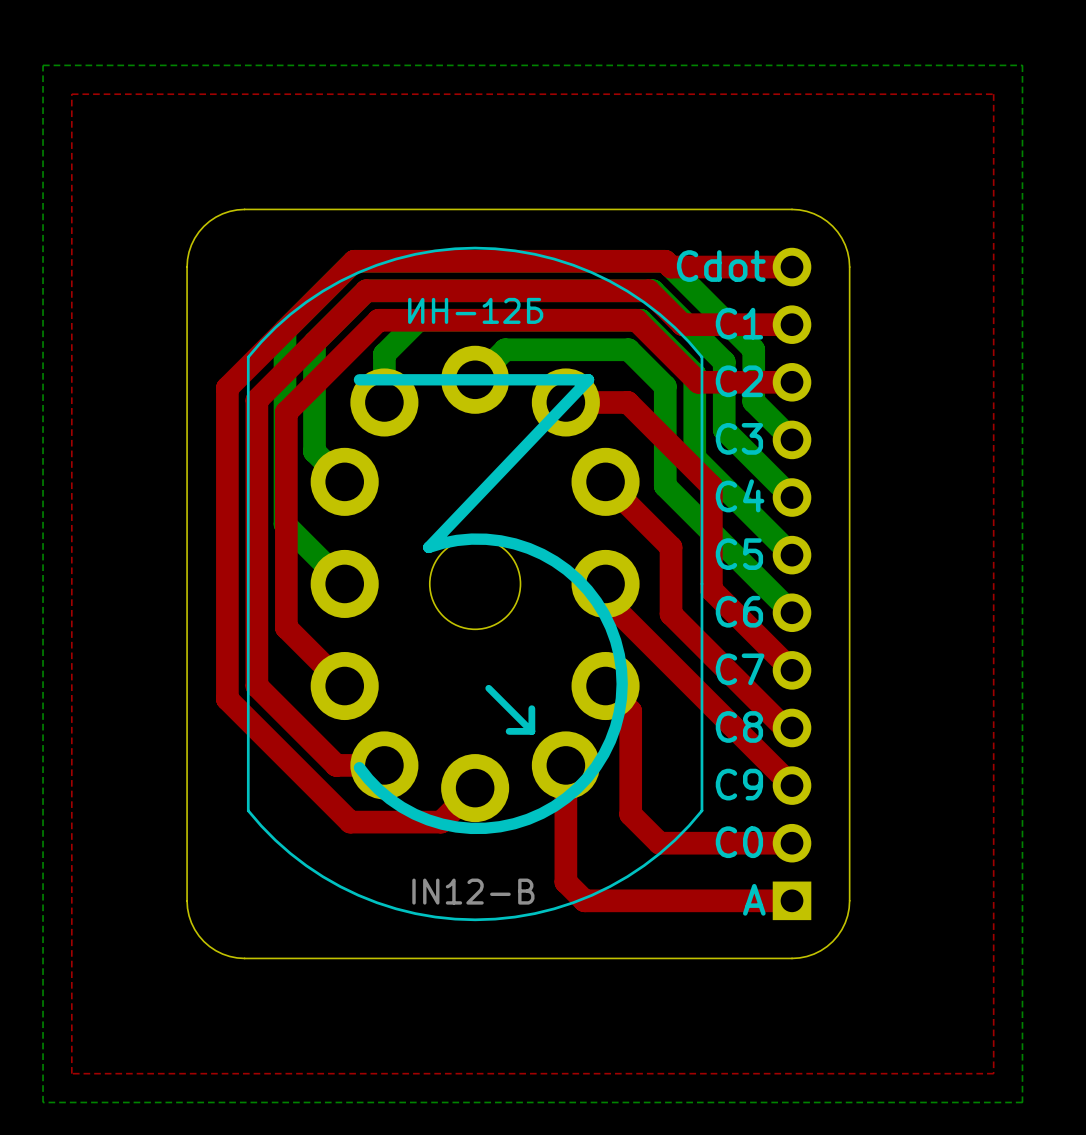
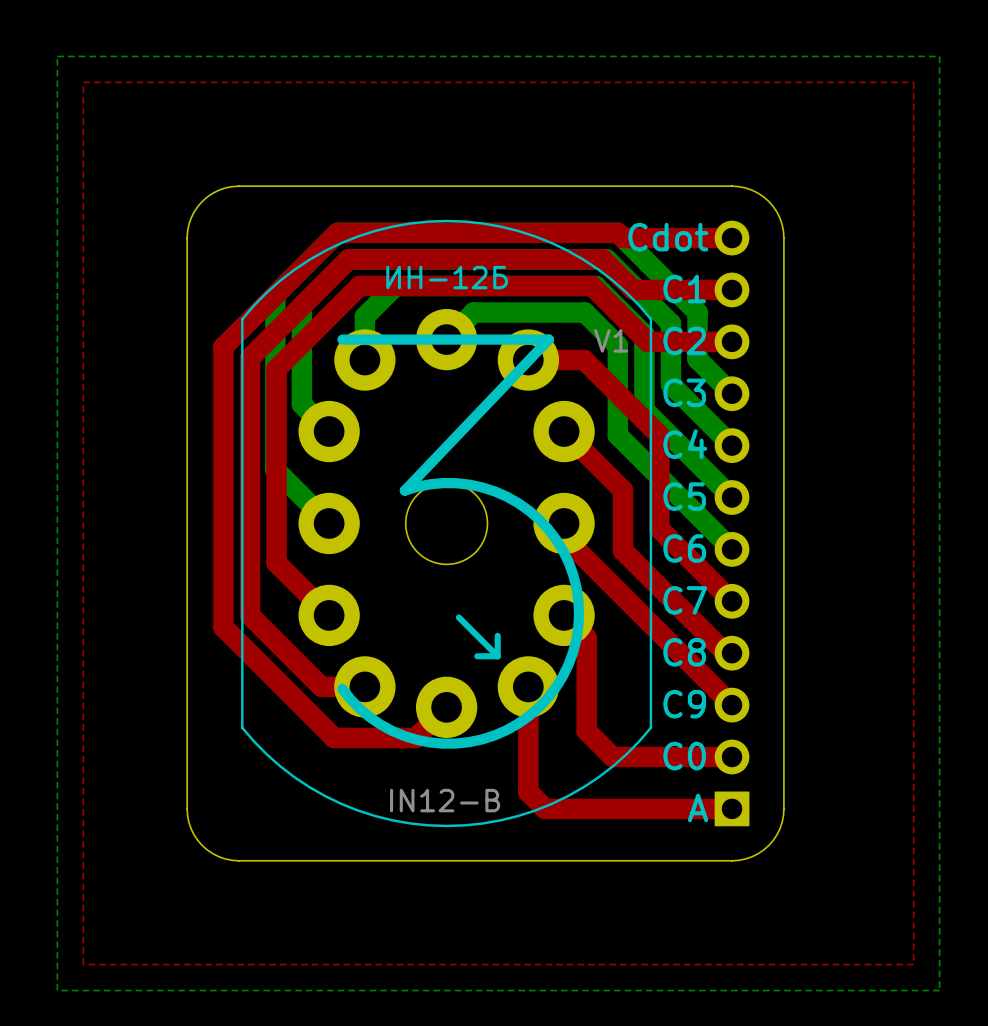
part: IN12-B (475, 583) -> none
V1: none -> IN12-B (446, 523)

